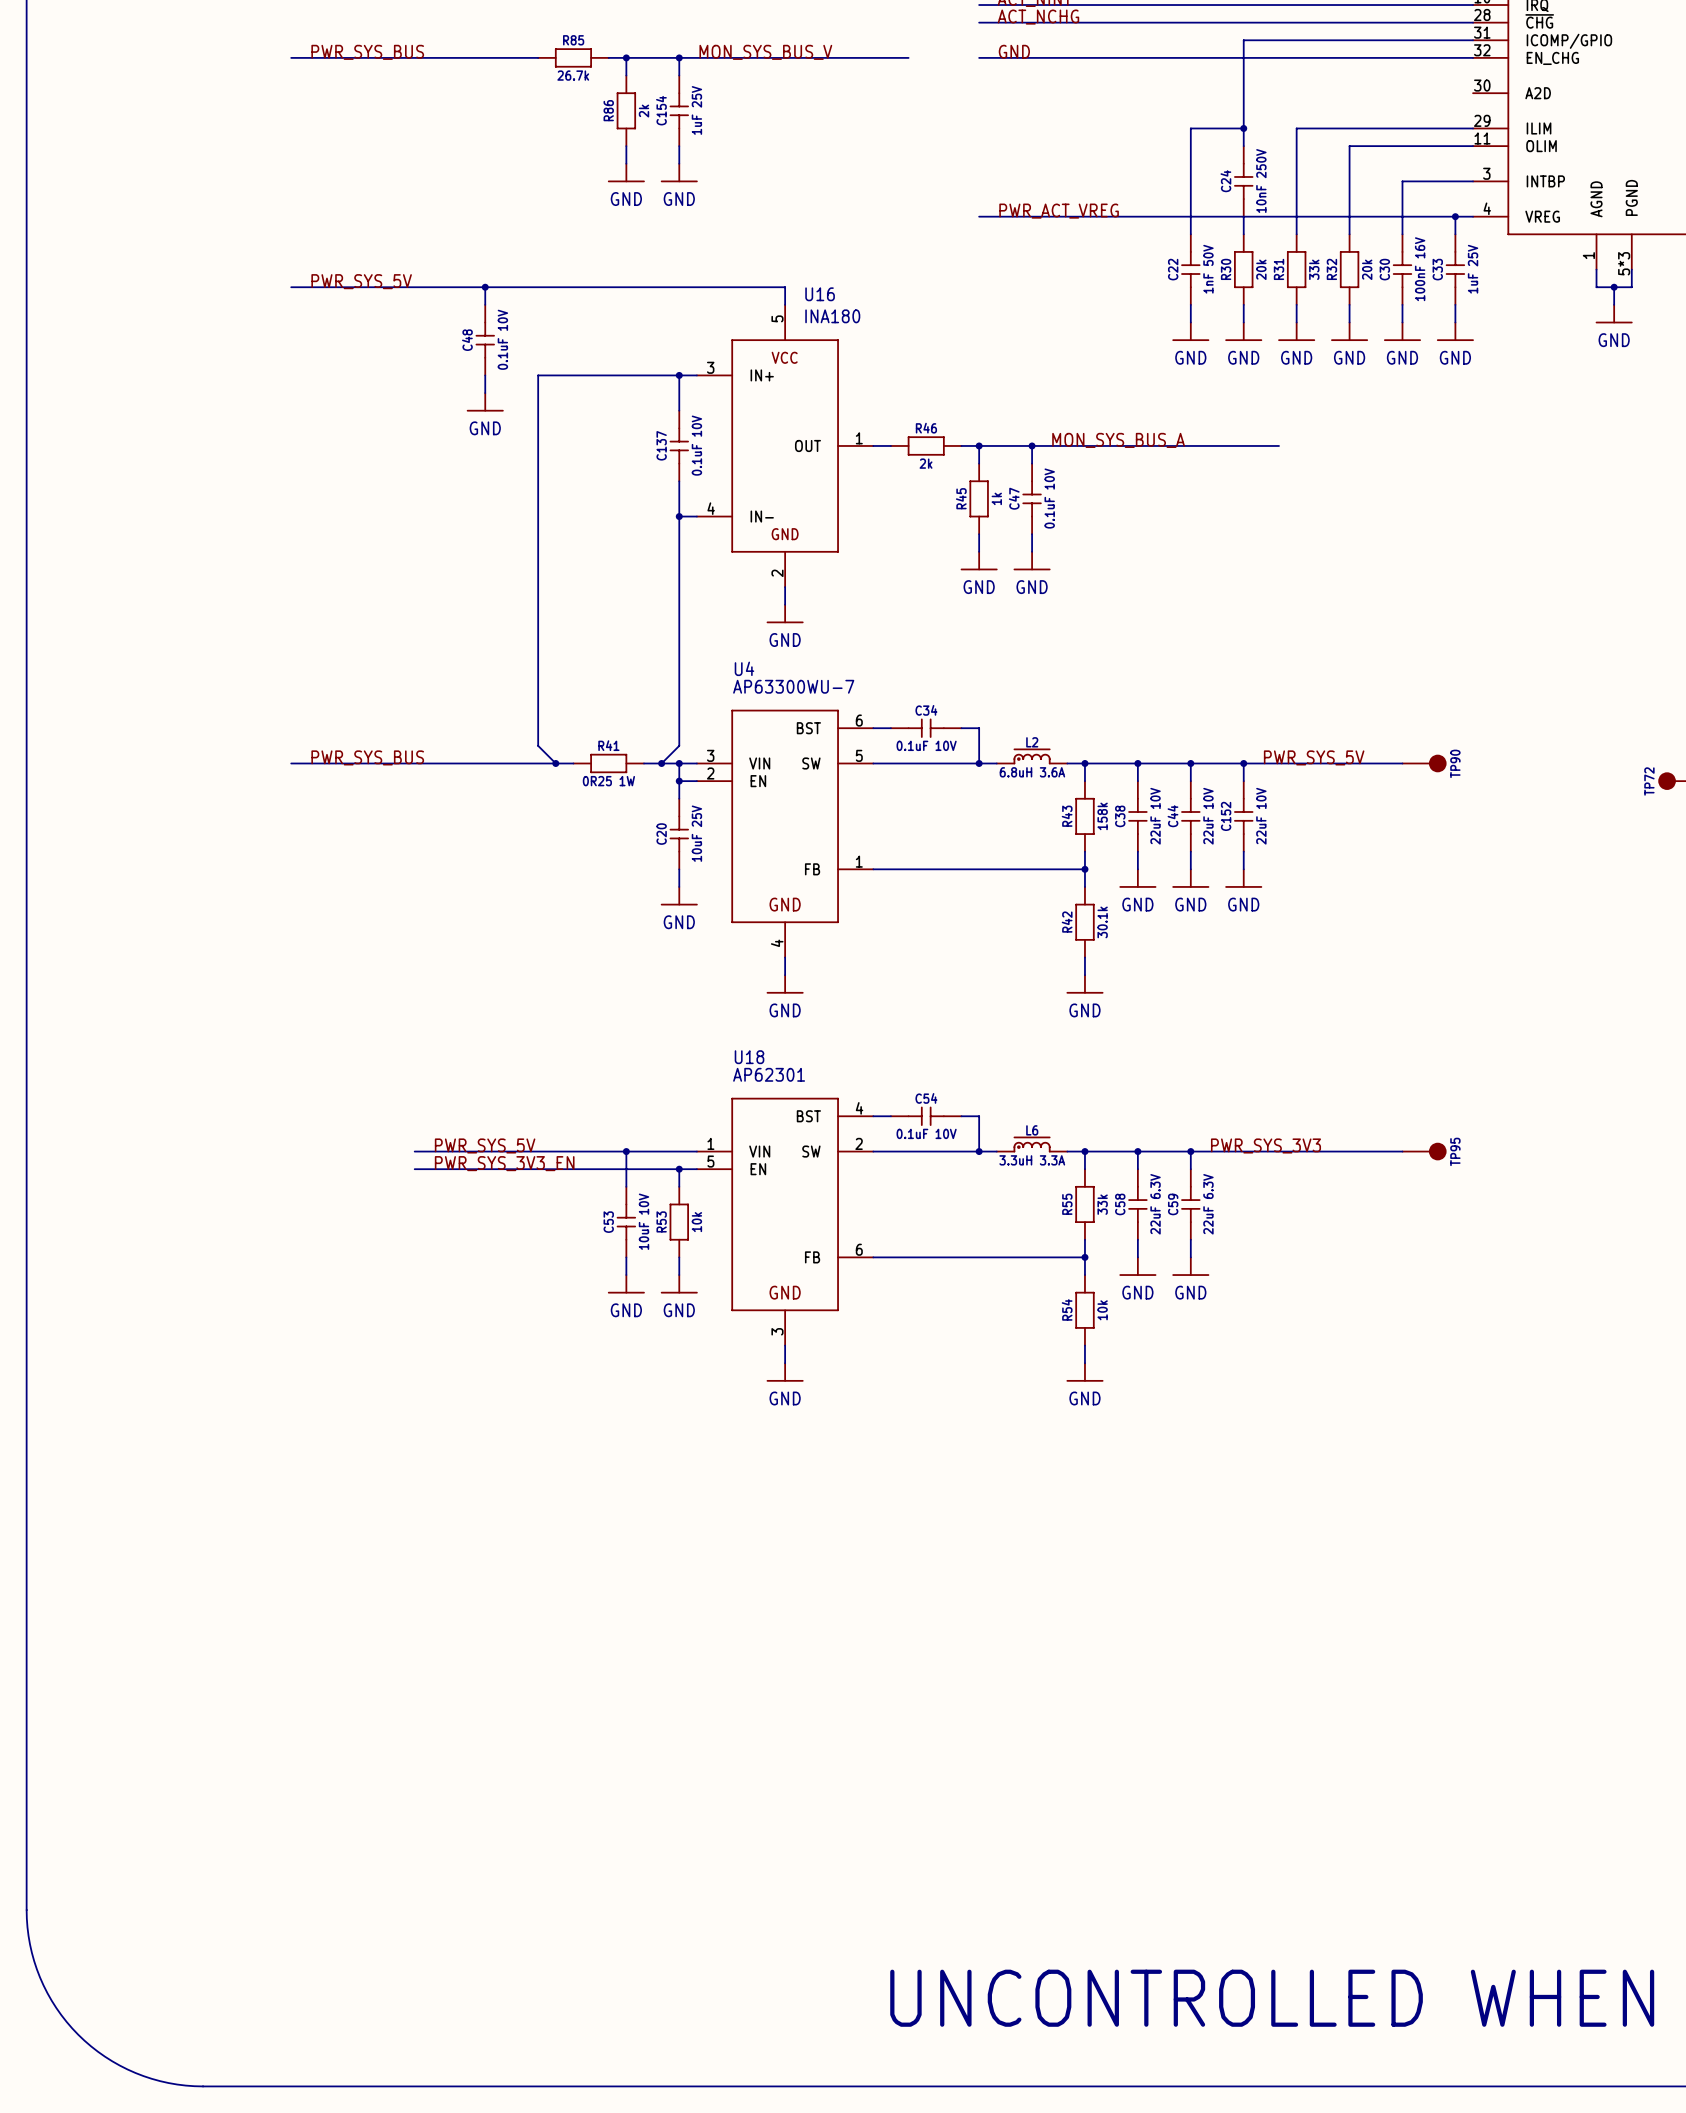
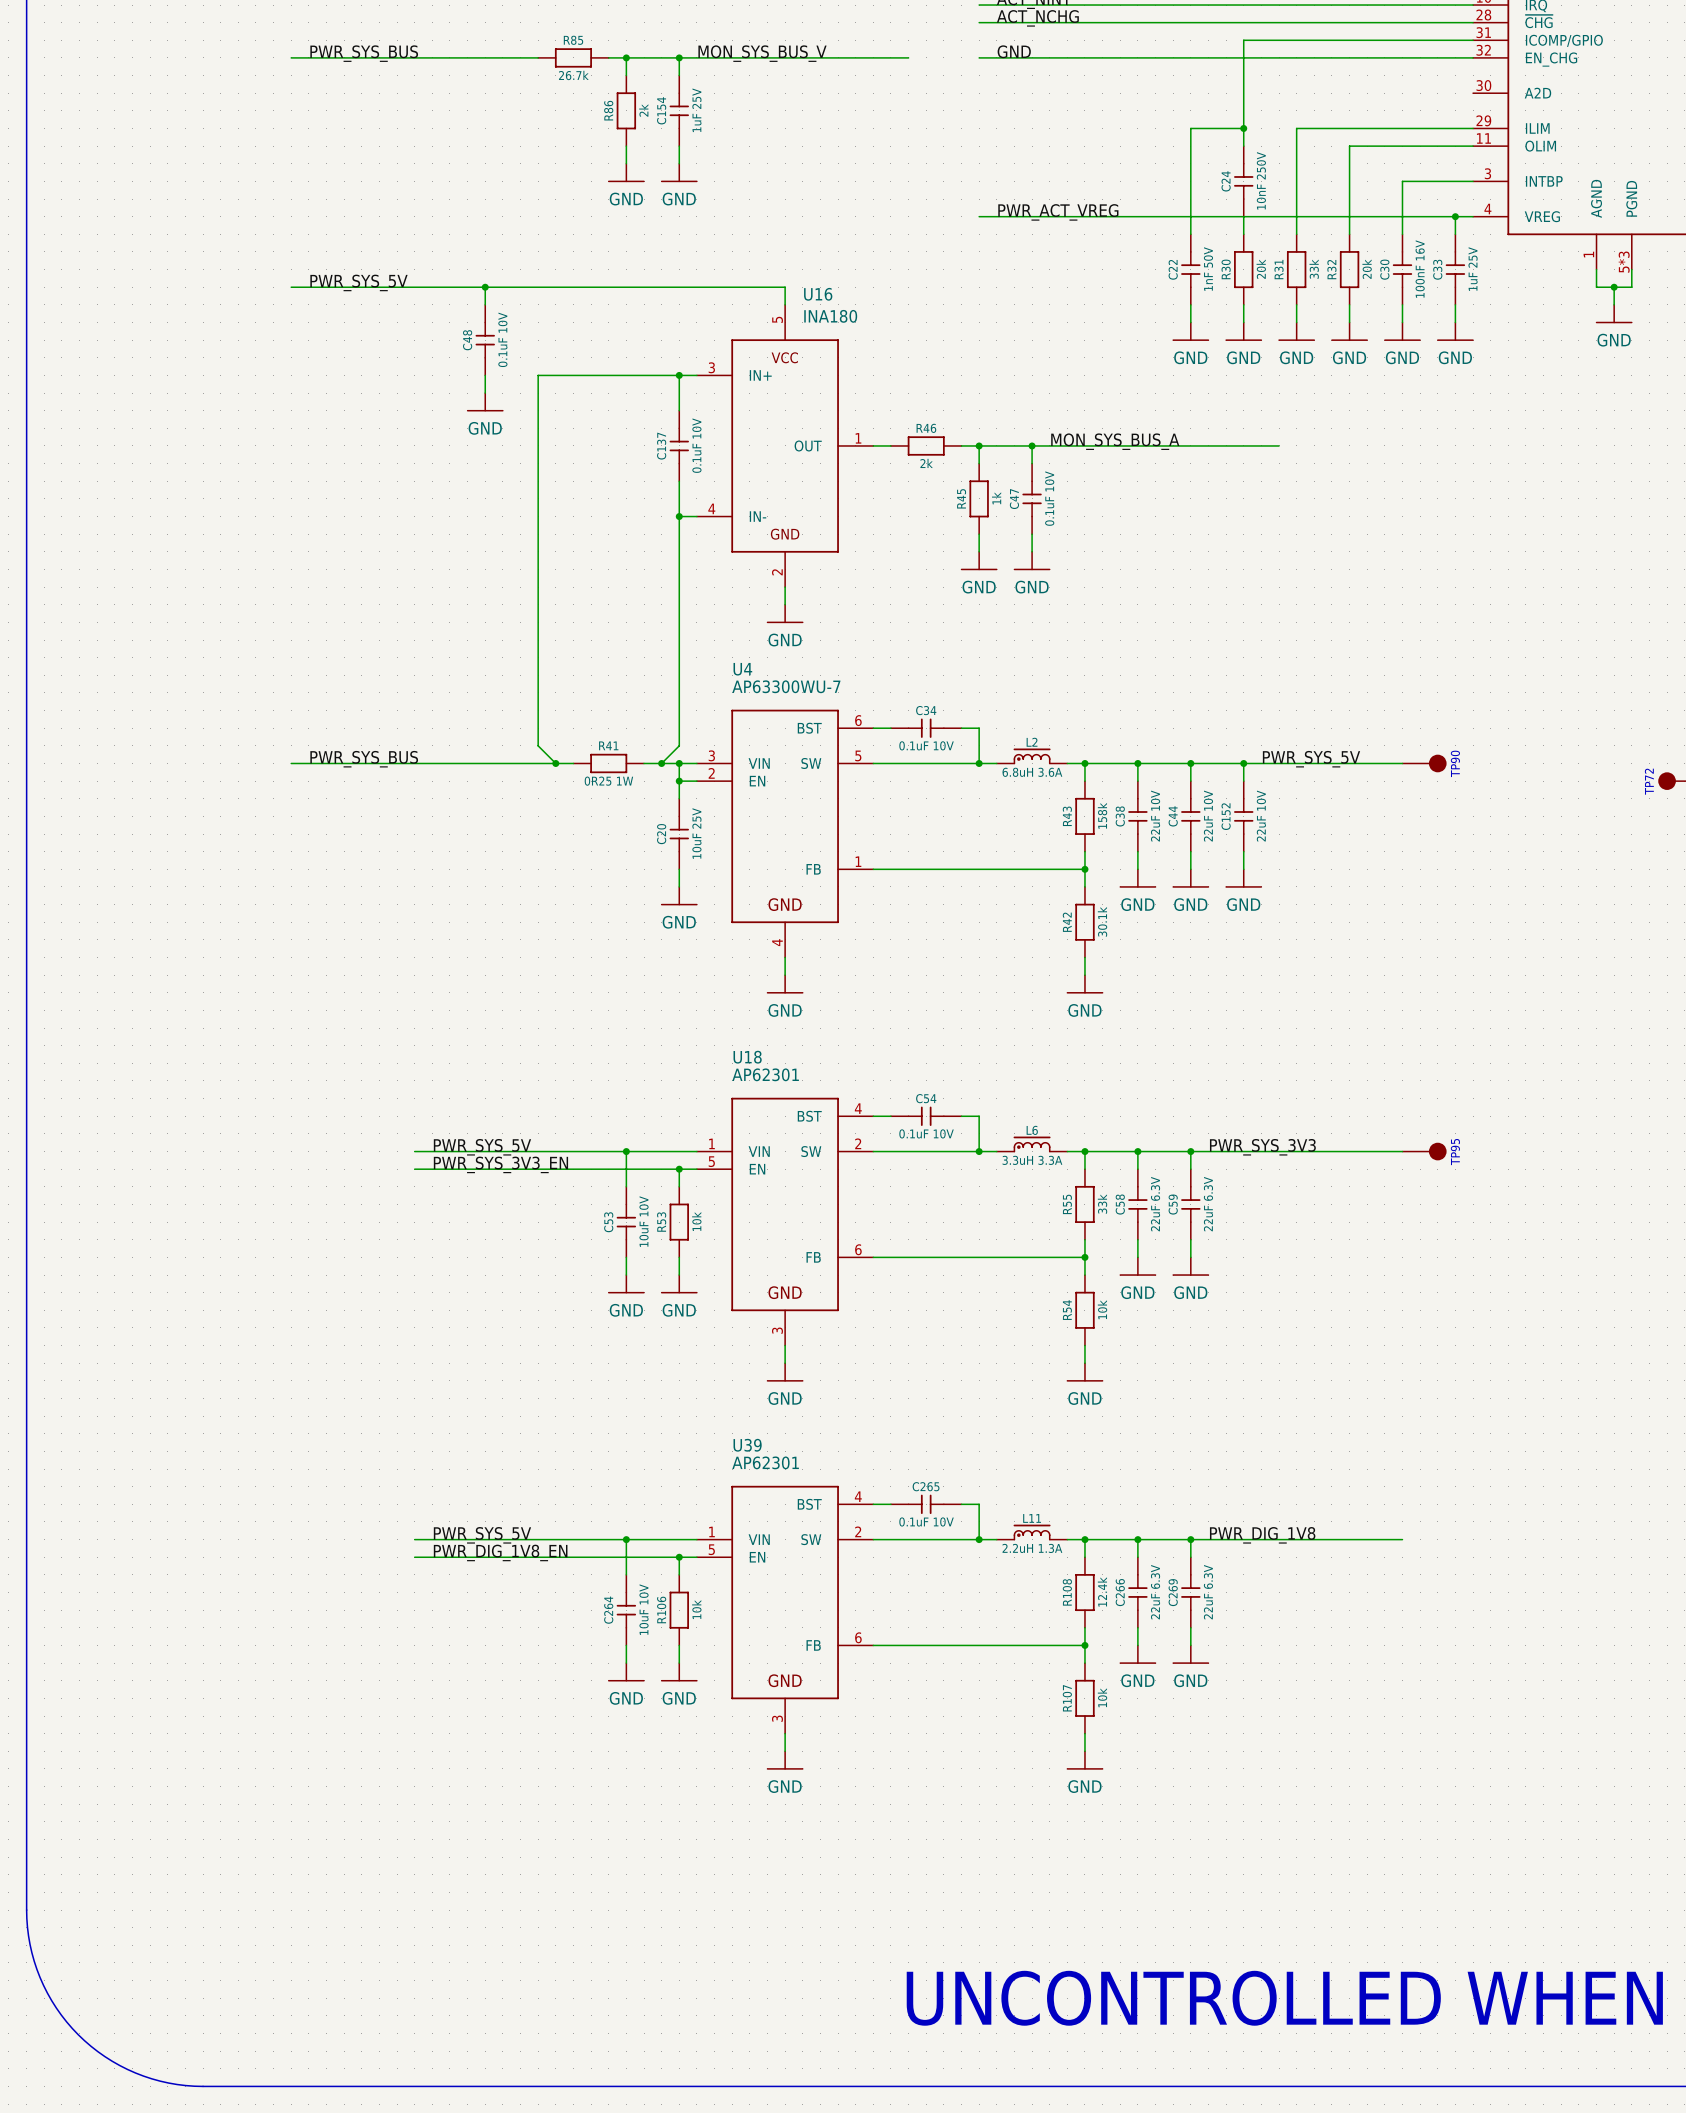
wire: none -> (873, 1504) (890, 1504)
C265: none -> 0.1uF 10V (926, 1504)
wire: none -> (961, 1504) (979, 1504) (979, 1539)
L11: none -> 2.2uH 1.3A (1032, 1532)
label: none -> PWR_SYS_5V (482, 1535)
label: none -> PWR_DIG_1V8 (1262, 1535)
wire: none -> (414, 1539) (696, 1539)
wire: none -> (626, 1539) (626, 1574)
junction: none -> (626, 1539)
wire: none -> (873, 1539) (996, 1539)
junction: none -> (979, 1539)
wire: none -> (1067, 1539) (1402, 1539)
wire: none -> (1084, 1539) (1084, 1557)
junction: none -> (1084, 1539)
wire: none -> (1137, 1539) (1137, 1557)
junction: none -> (1137, 1539)
wire: none -> (1190, 1539) (1190, 1557)
junction: none -> (1190, 1539)
label: none -> PWR_DIG_1V8_EN (500, 1552)
wire: none -> (414, 1557) (696, 1557)
wire: none -> (679, 1557) (679, 1574)
junction: none -> (679, 1557)
R108: none -> 12.4k (1084, 1592)
C266: none -> 22uF 6.3V (1137, 1592)
C269: none -> 22uF 6.3V (1190, 1592)
U39: none -> AP62301 (785, 1609)
C264: none -> 10uF 10V (626, 1610)
R106: none -> 10k (679, 1610)
wire: none -> (1084, 1627) (1084, 1663)
wire: none -> (1137, 1627) (1137, 1645)
wire: none -> (1190, 1627) (1190, 1645)
wire: none -> (626, 1645) (626, 1663)
wire: none -> (679, 1645) (679, 1663)
wire: none -> (873, 1645) (1084, 1645)
junction: none -> (1084, 1645)
power symbol: none -> GND (1137, 1654)
power symbol: none -> GND (1190, 1654)
power symbol: none -> GND (626, 1672)
power symbol: none -> GND (679, 1672)
R107: none -> 10k (1084, 1698)
wire: none -> (785, 1733) (785, 1751)
wire: none -> (1084, 1733) (1084, 1751)
power symbol: none -> GND (785, 1760)
power symbol: none -> GND (1084, 1760)

